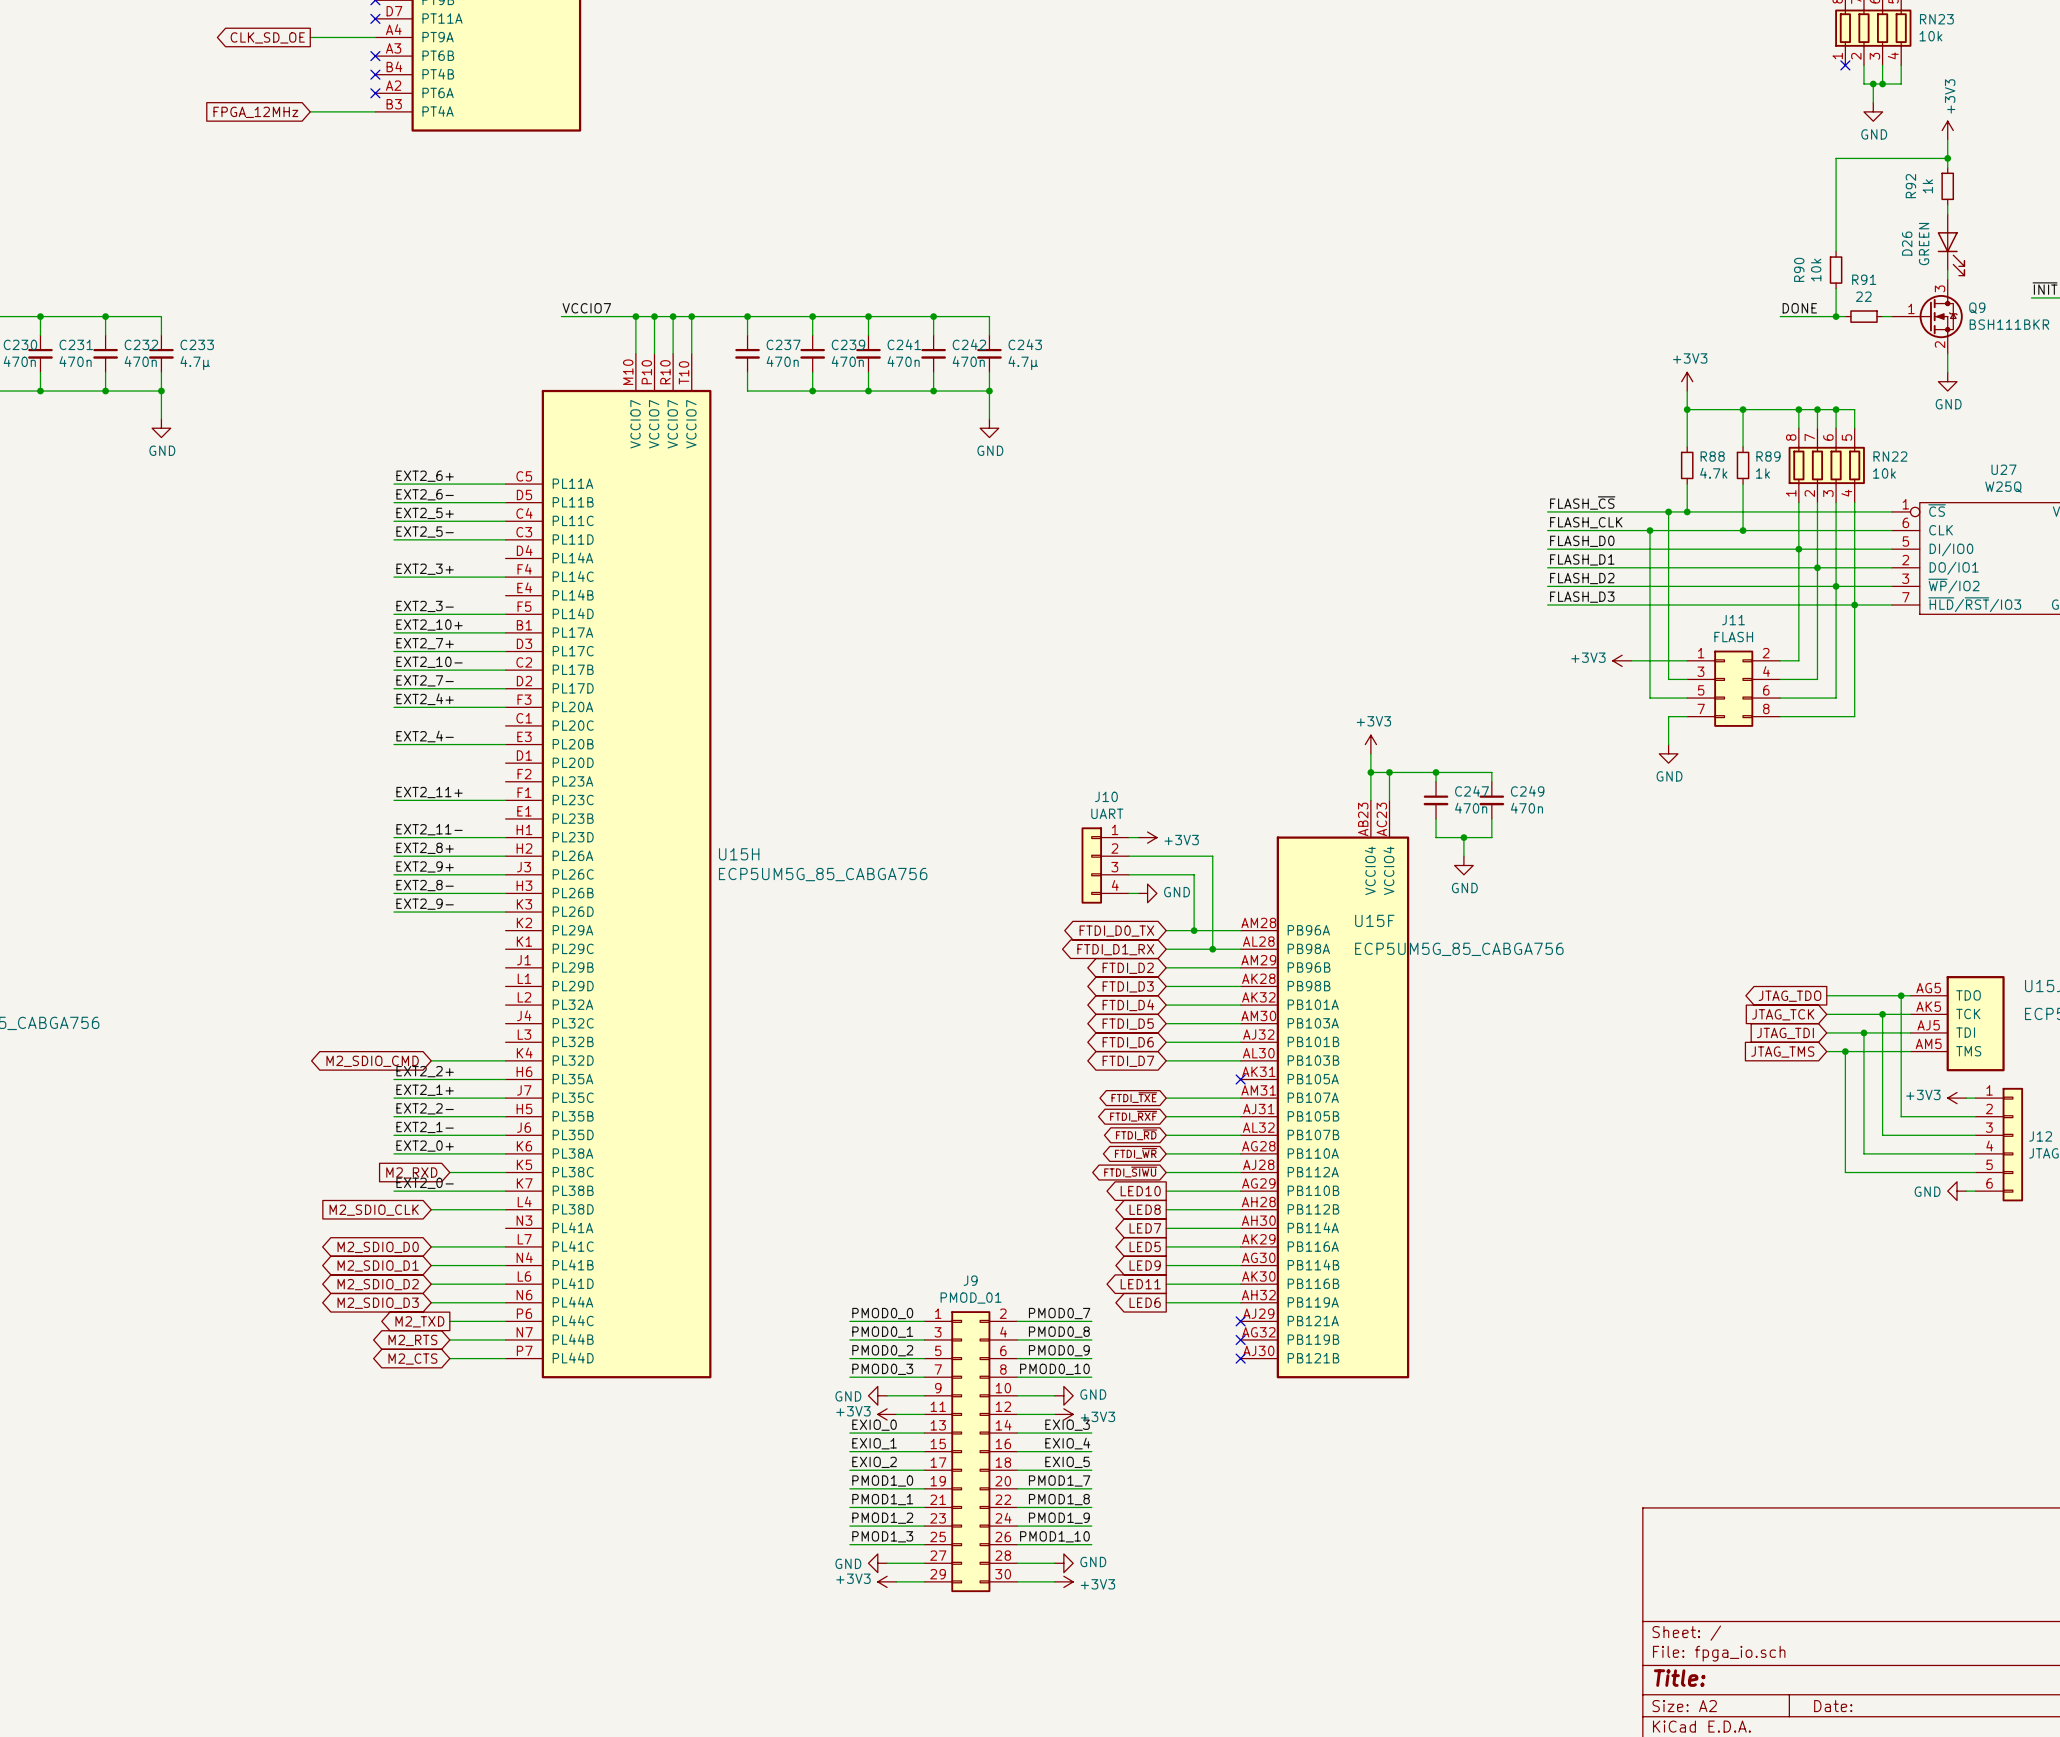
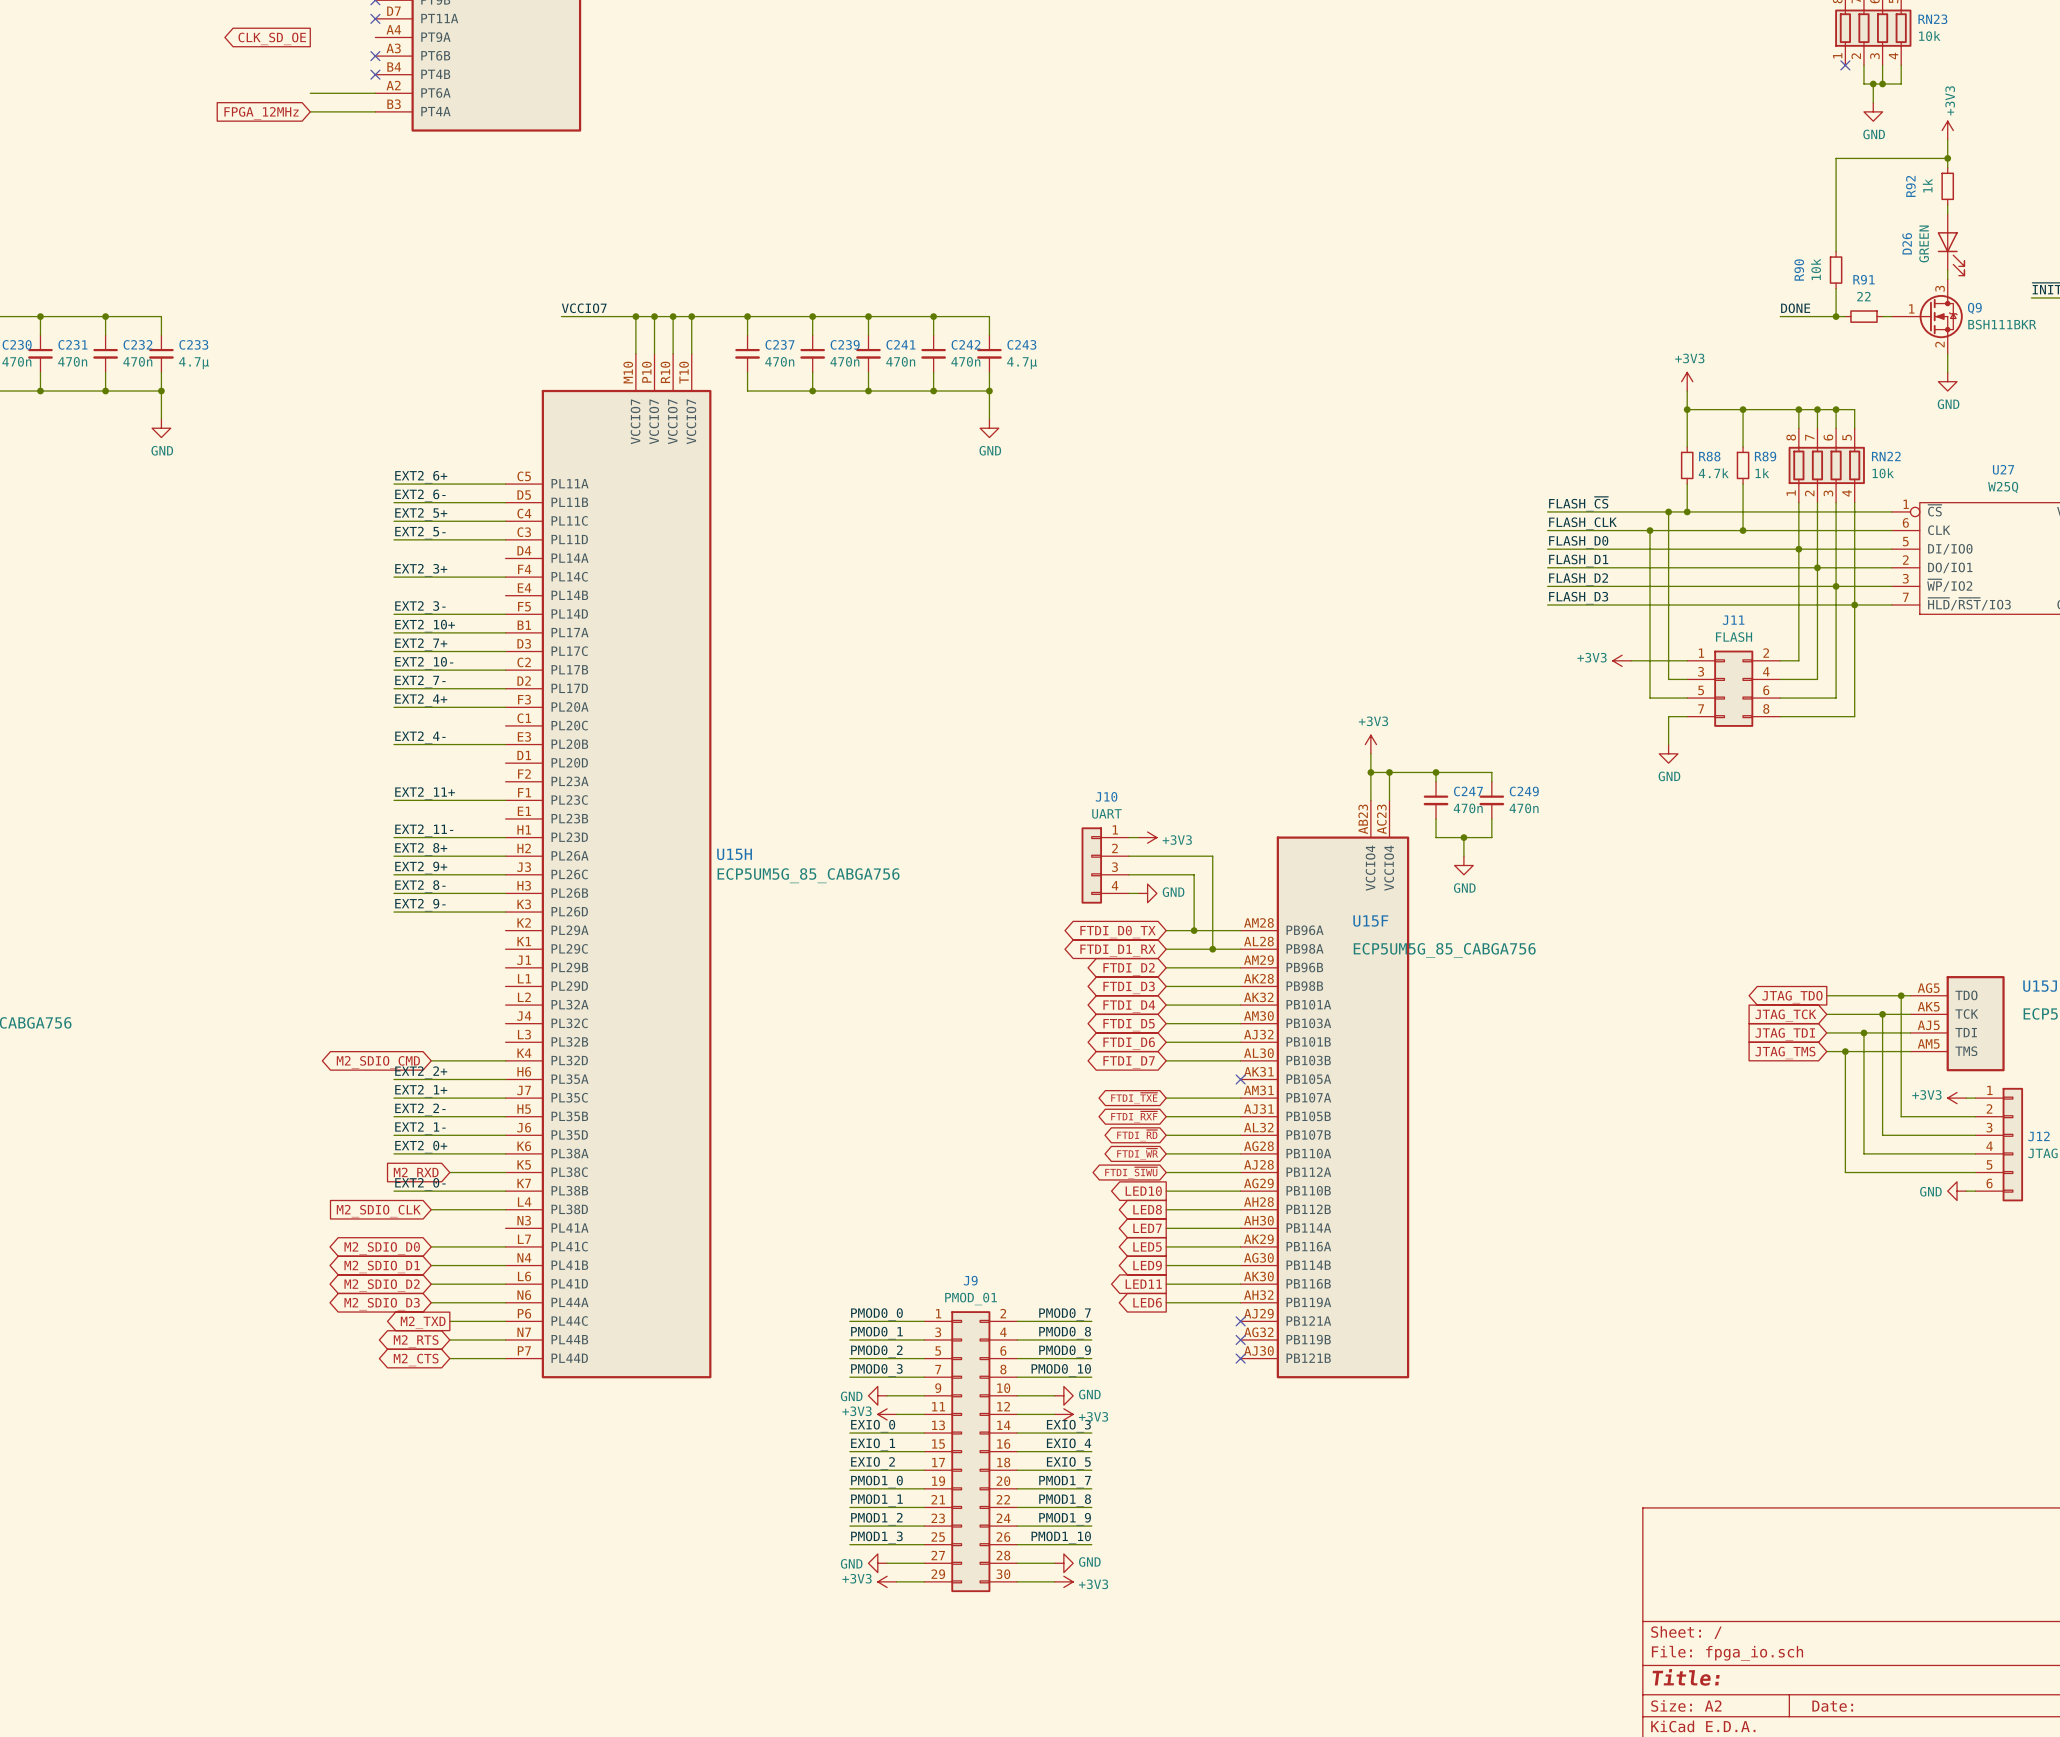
wire: (310, 37) (375, 37) -> (310, 93) (375, 93)
no-connect mark: (375, 93) -> none

